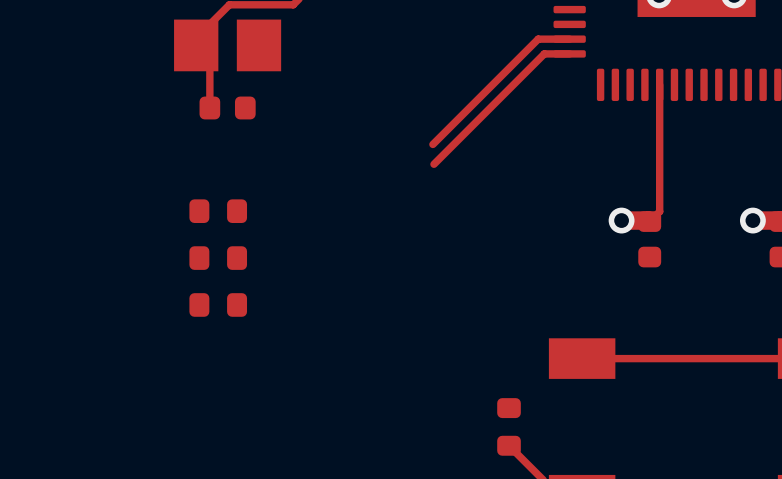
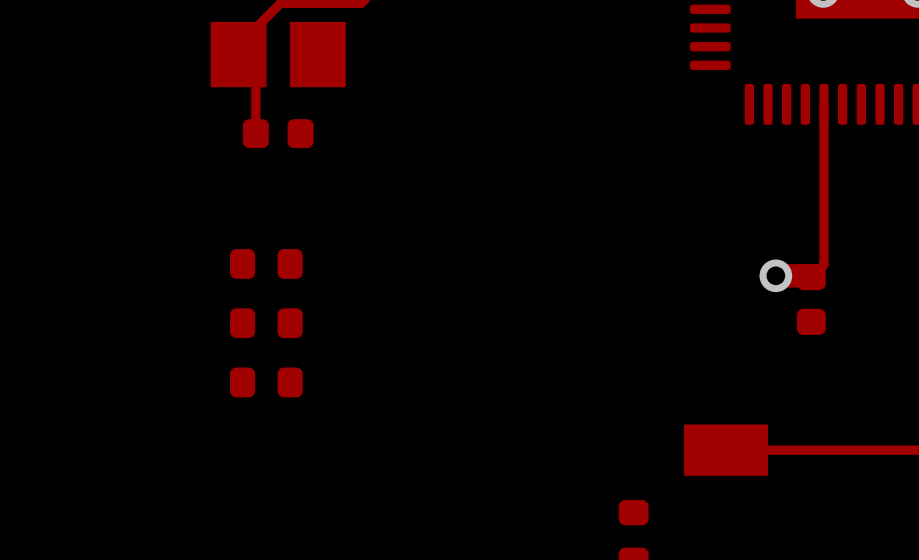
top track: (569, 39) (538, 39) (432, 144) -> none
top track: (569, 53) (544, 53) (433, 164) -> none

